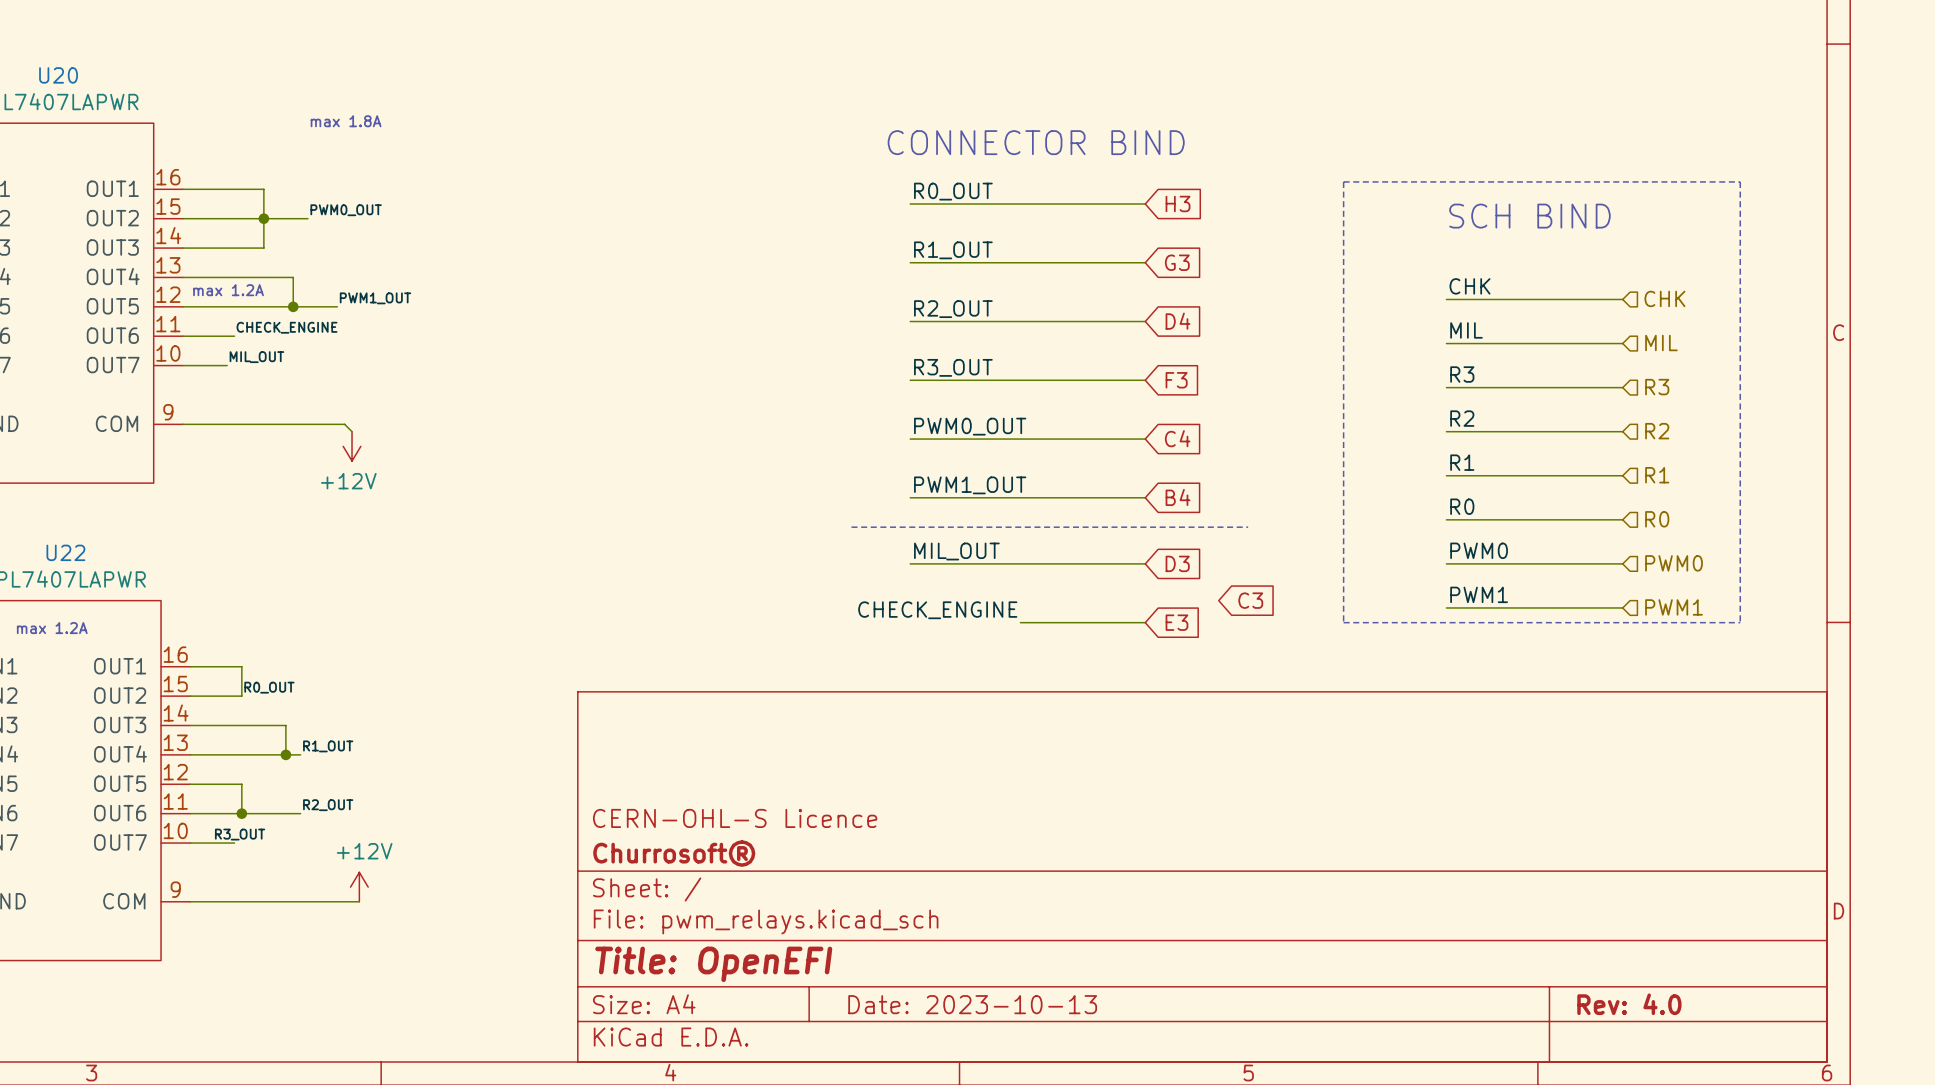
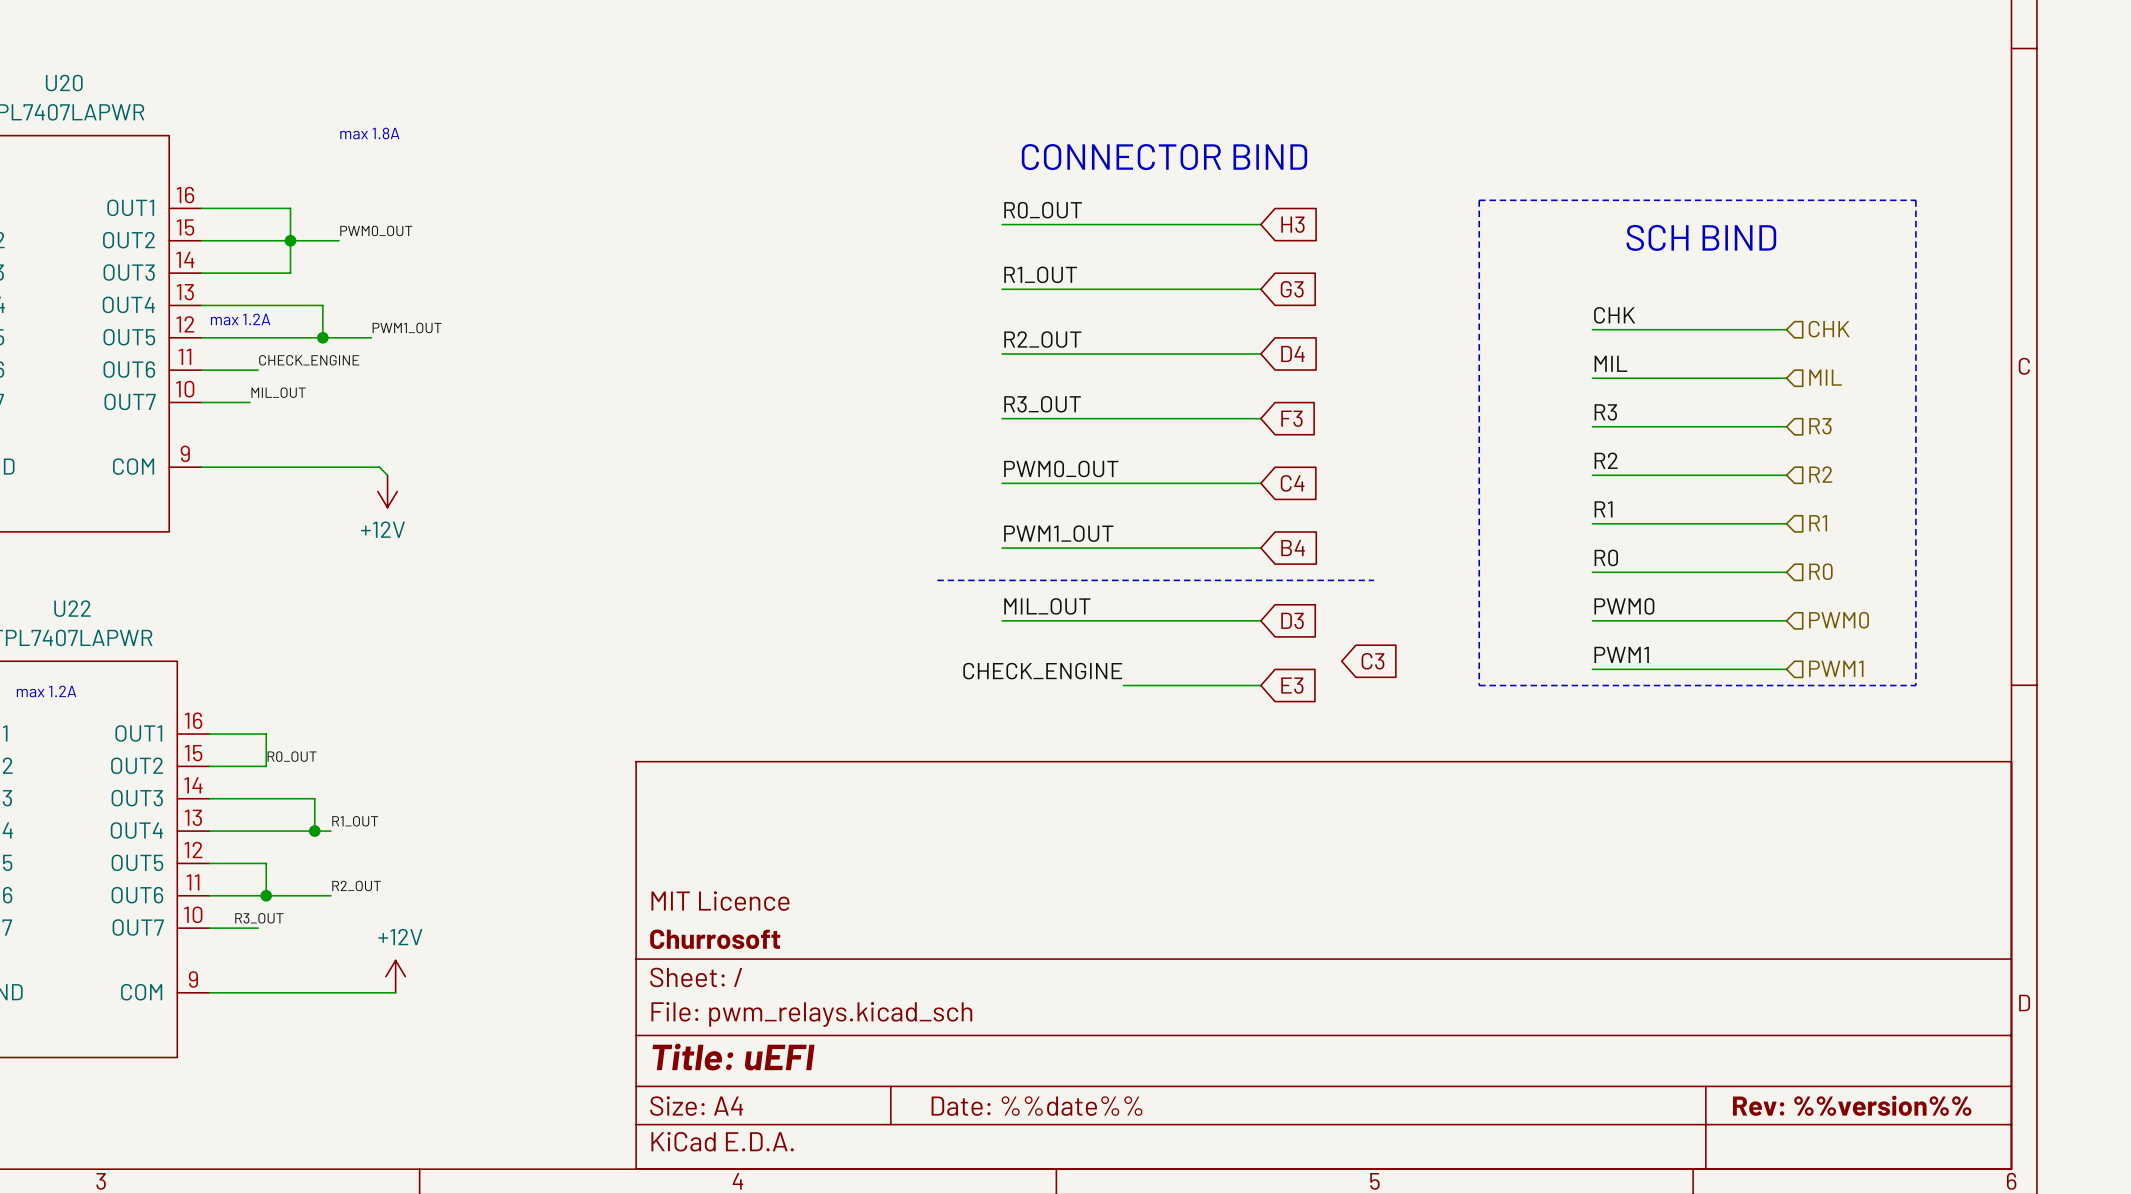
title block: CERN-OHL-S Licence (735, 818) -> MIT Licence (720, 901)
title block: Churrosoft® (674, 853) -> Churrosoft (715, 939)
title block: Title: OpenEFI (713, 964) -> Title: uEFI (733, 1057)
title block: Date: 2023-10-13 (972, 1004) -> Date: %%date%% (1036, 1106)
title block: Rev: 4.0 (1629, 1004) -> Rev: %%version%% (1852, 1105)

